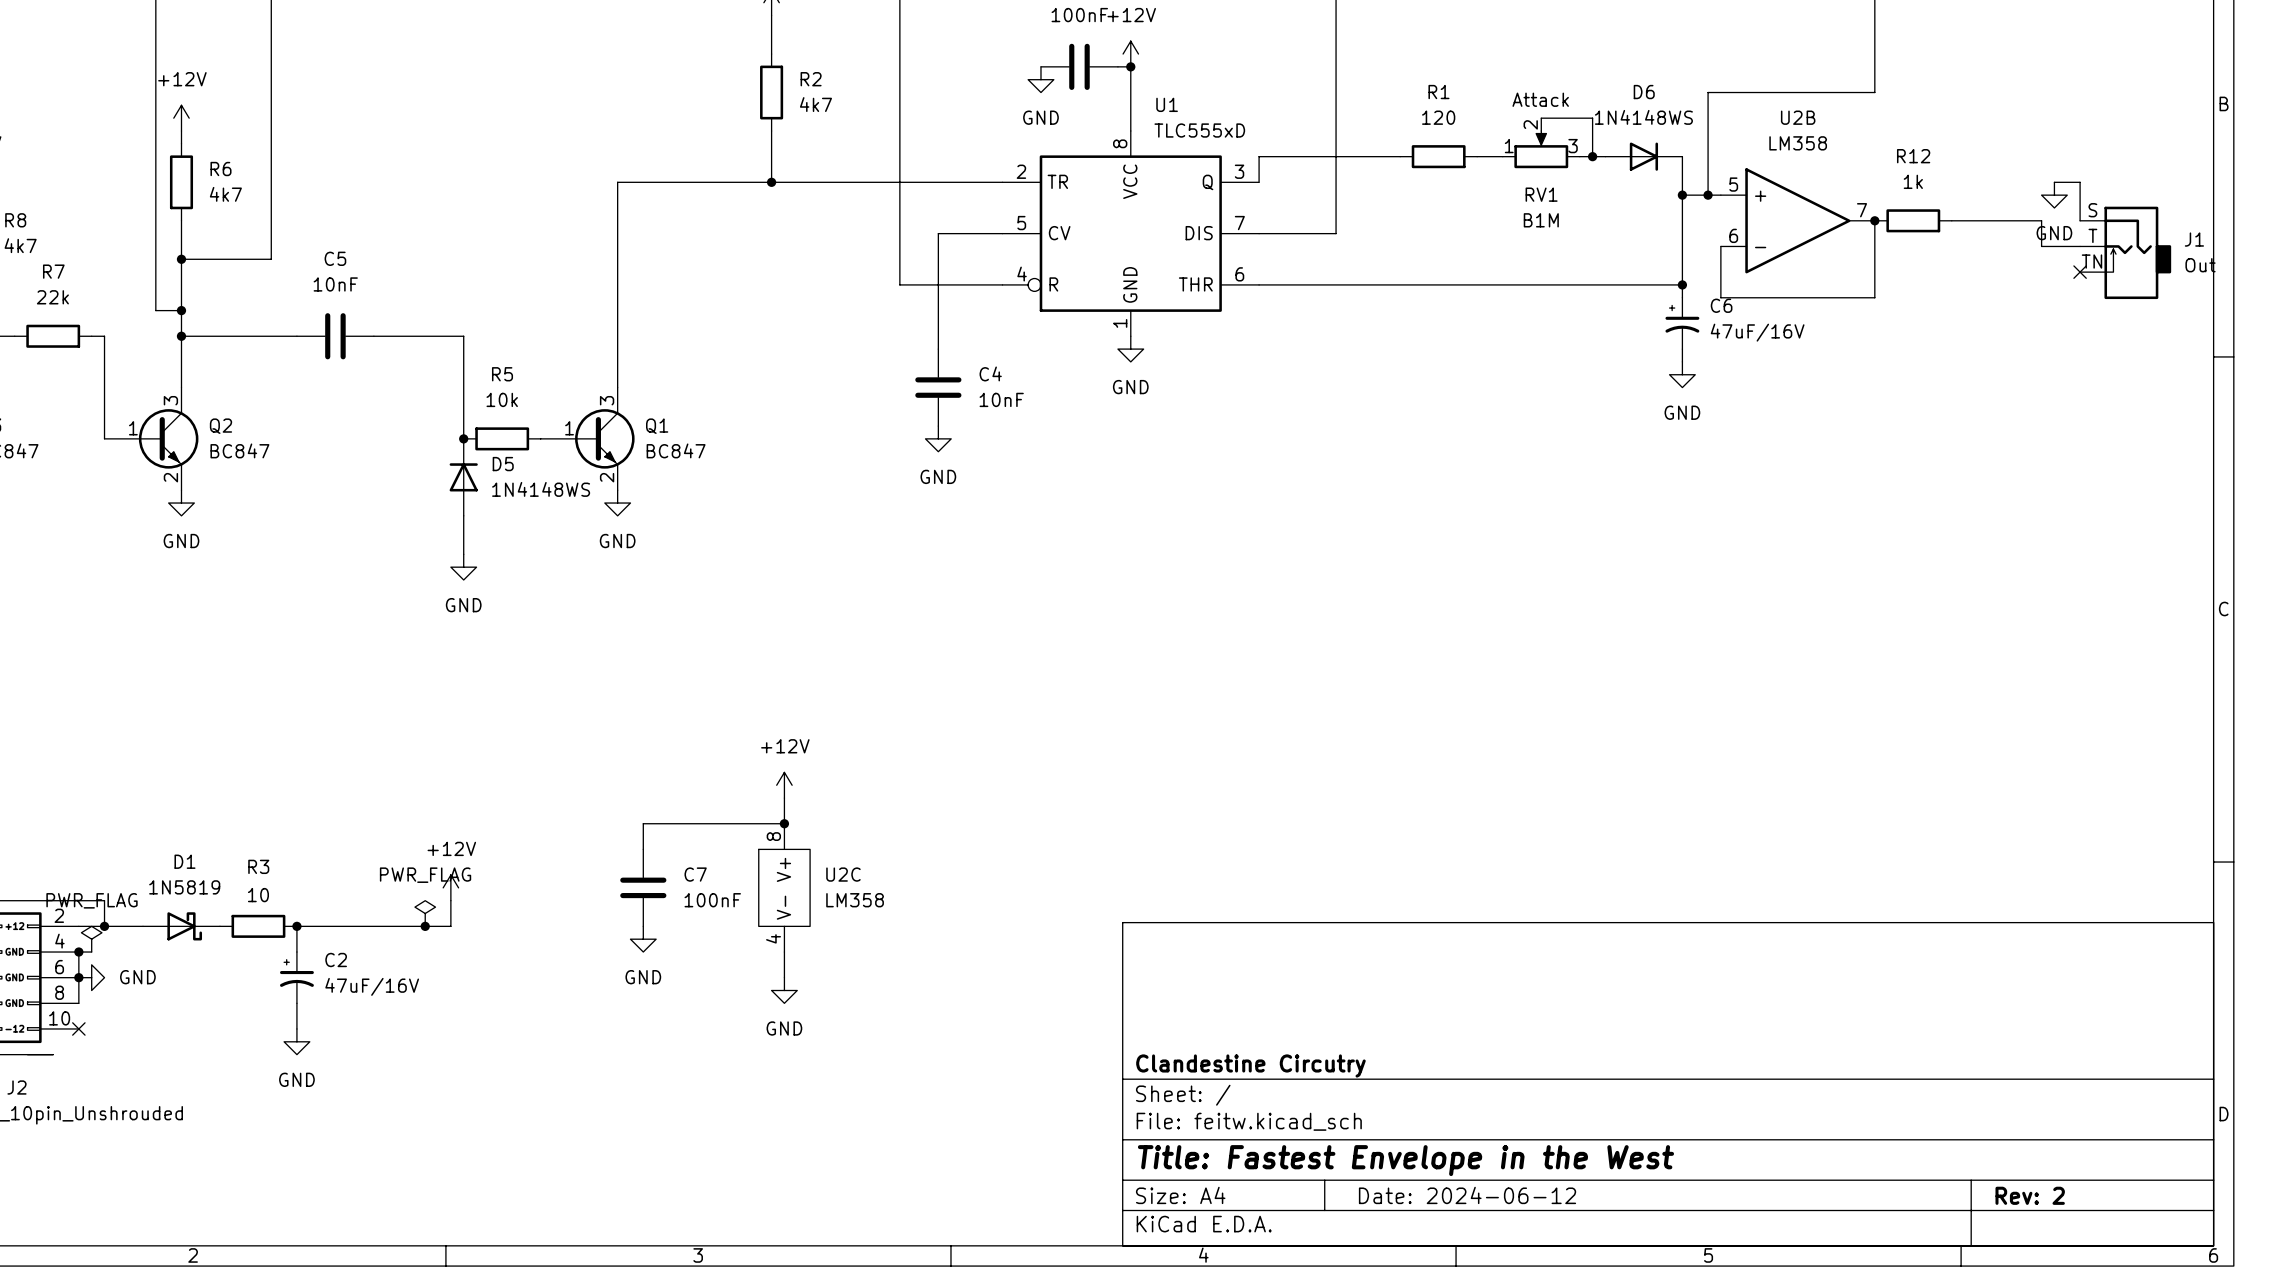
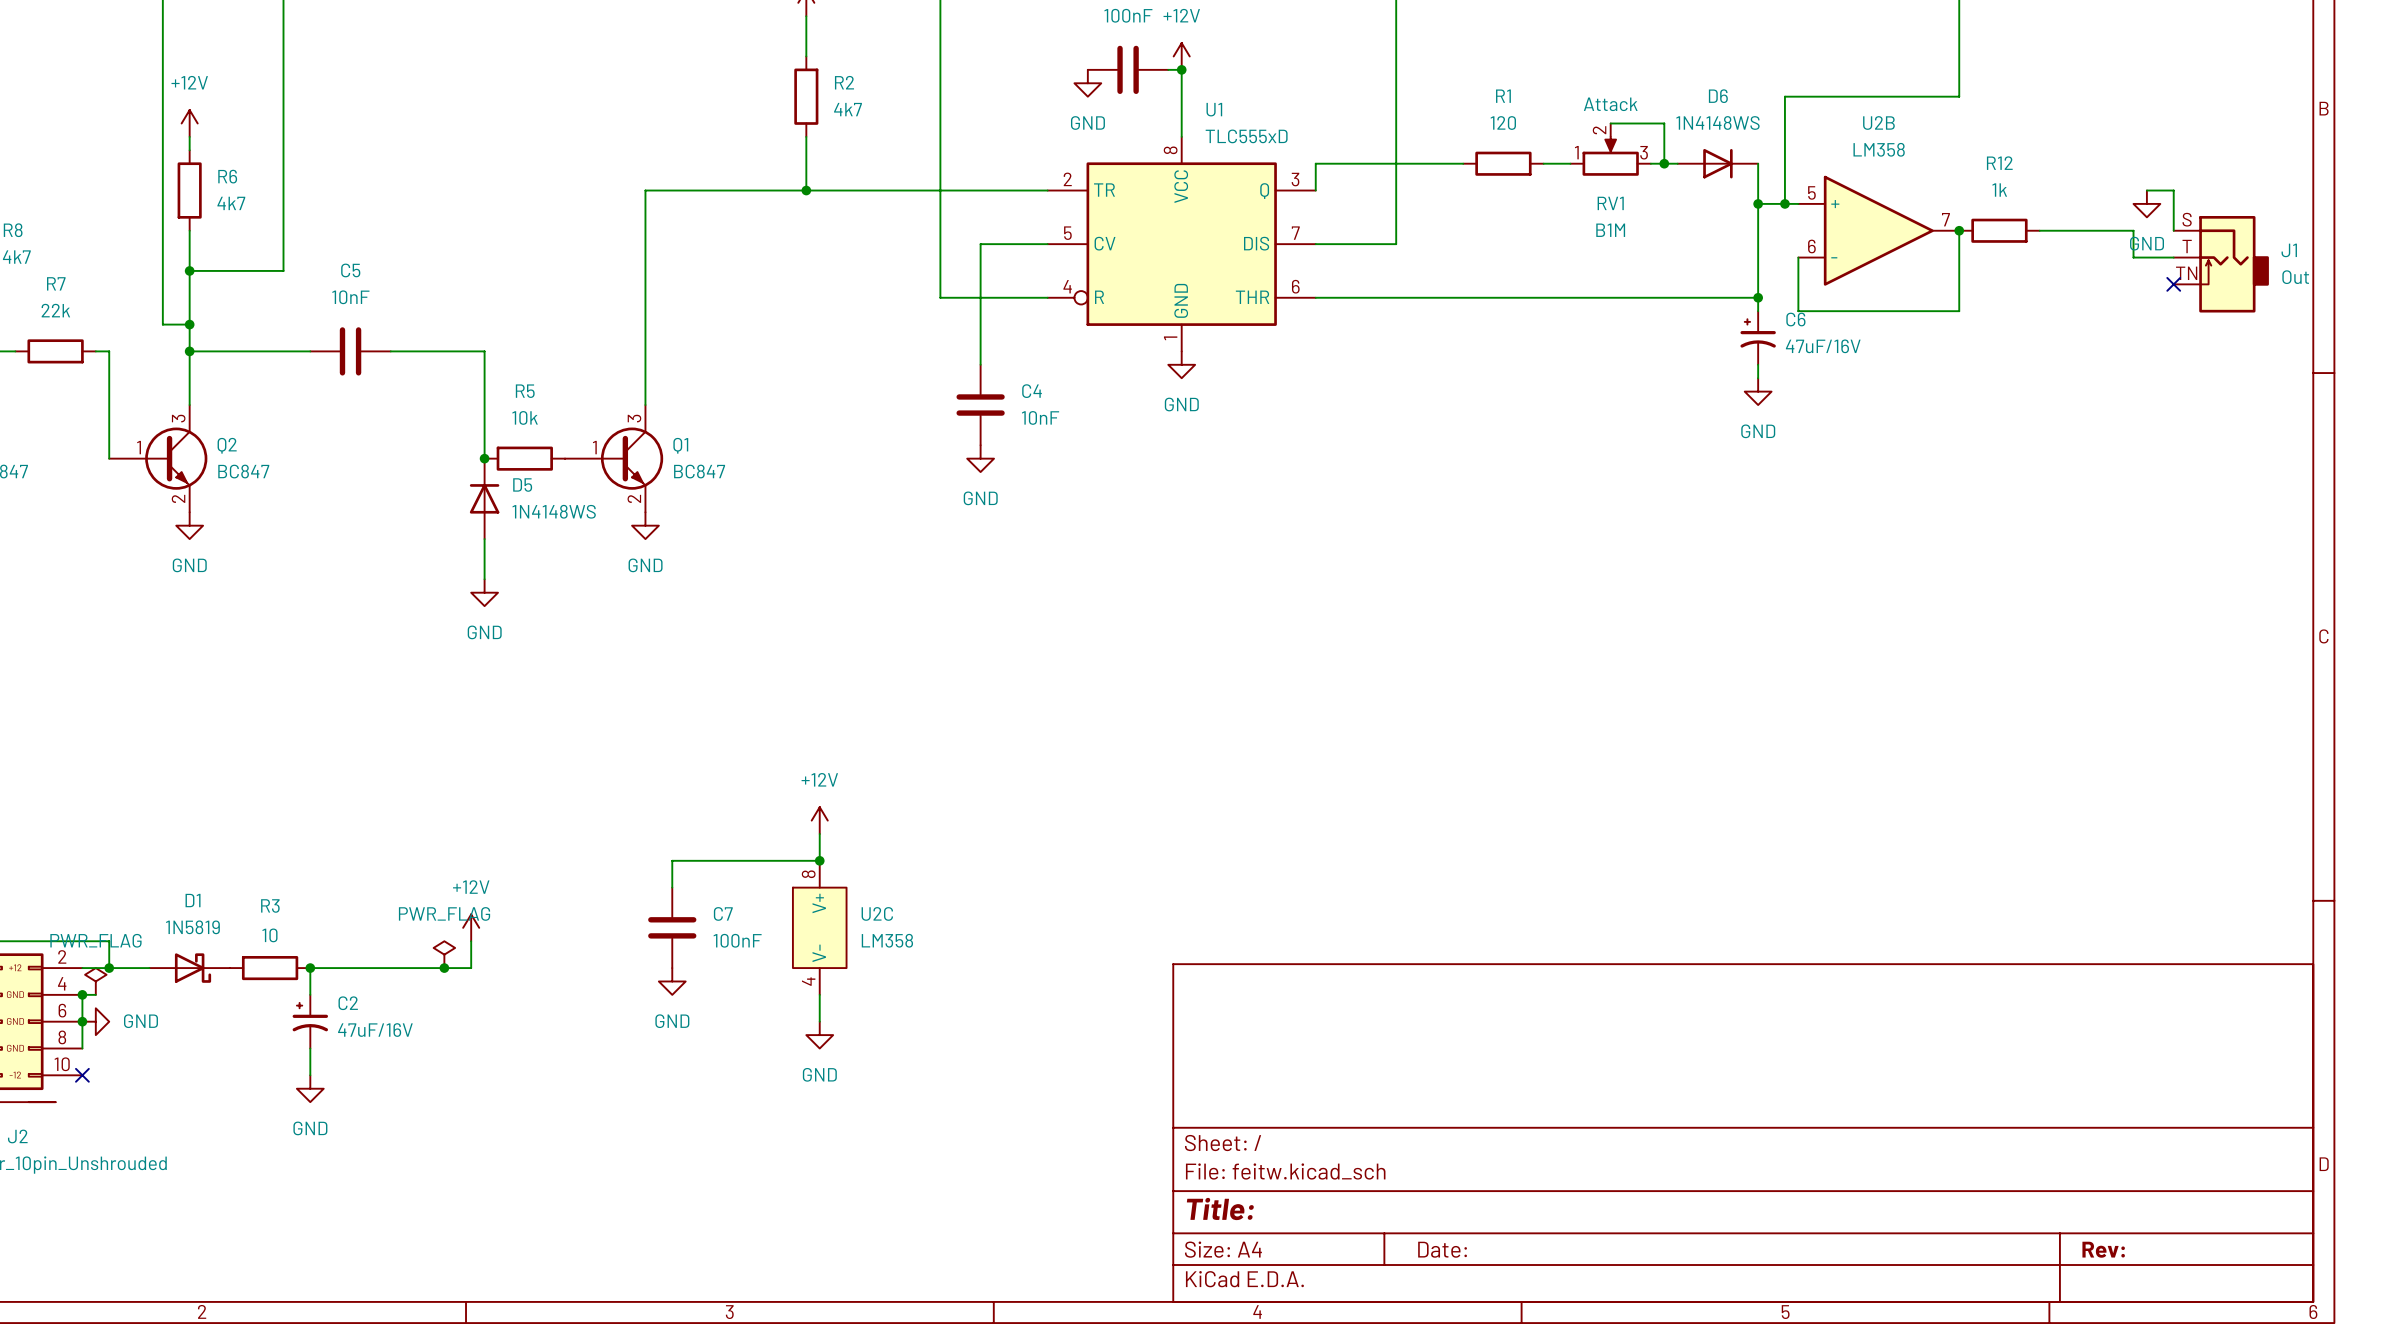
title block: Clandestine Circutry (1250, 1065) -> none
title block: Title: Fastest Envelope in the West (1405, 1160) -> Title: (1220, 1208)
title block: Date: 2024-06-12 (1467, 1195) -> Date: (1442, 1249)
title block: Rev: 2 (2030, 1195) -> Rev: (2103, 1249)

